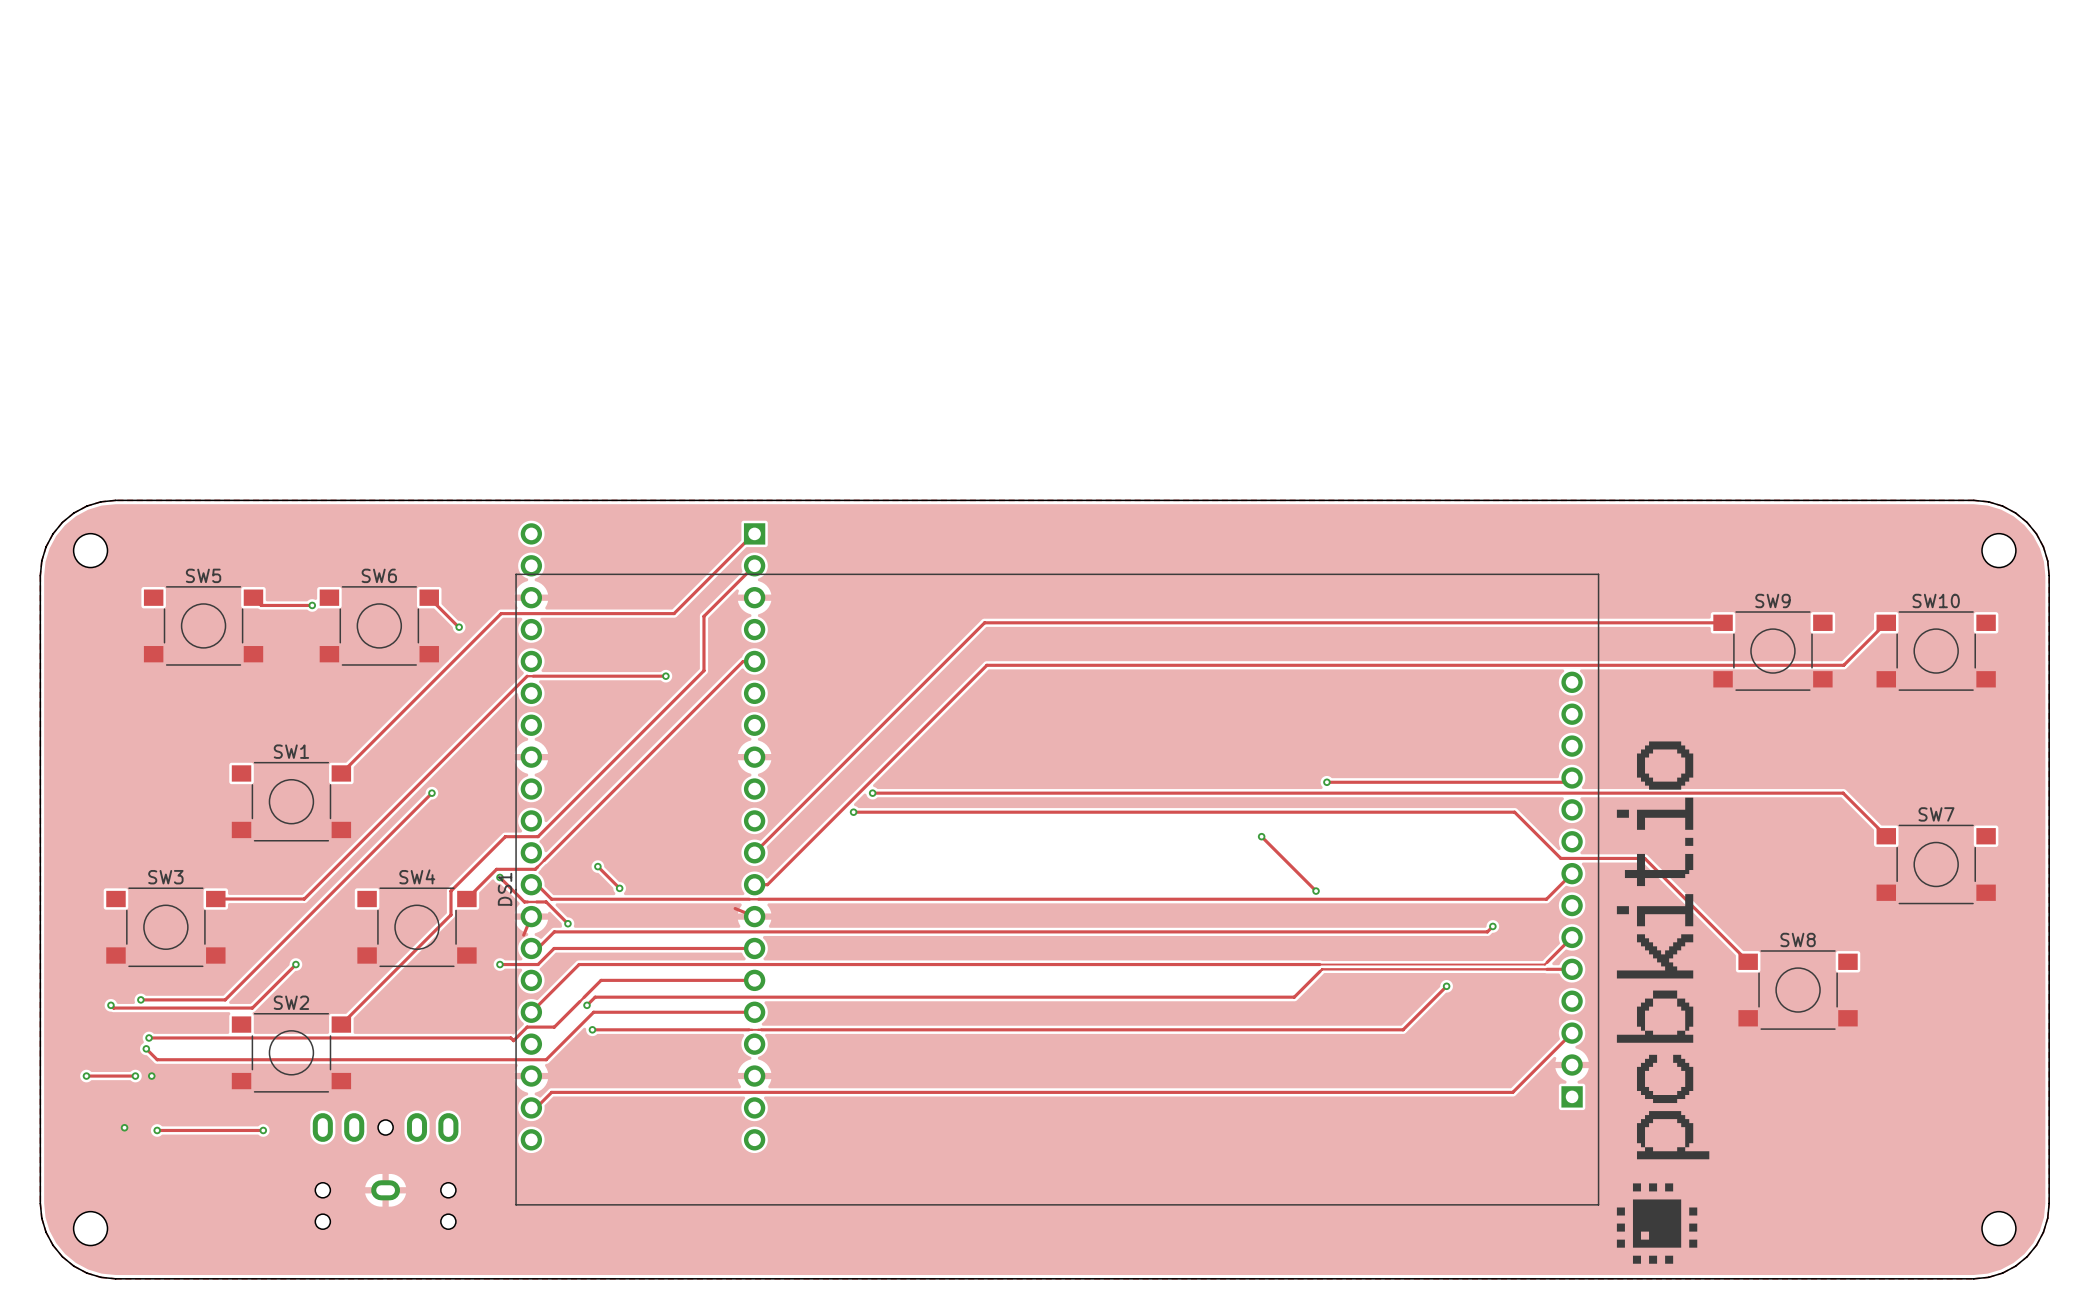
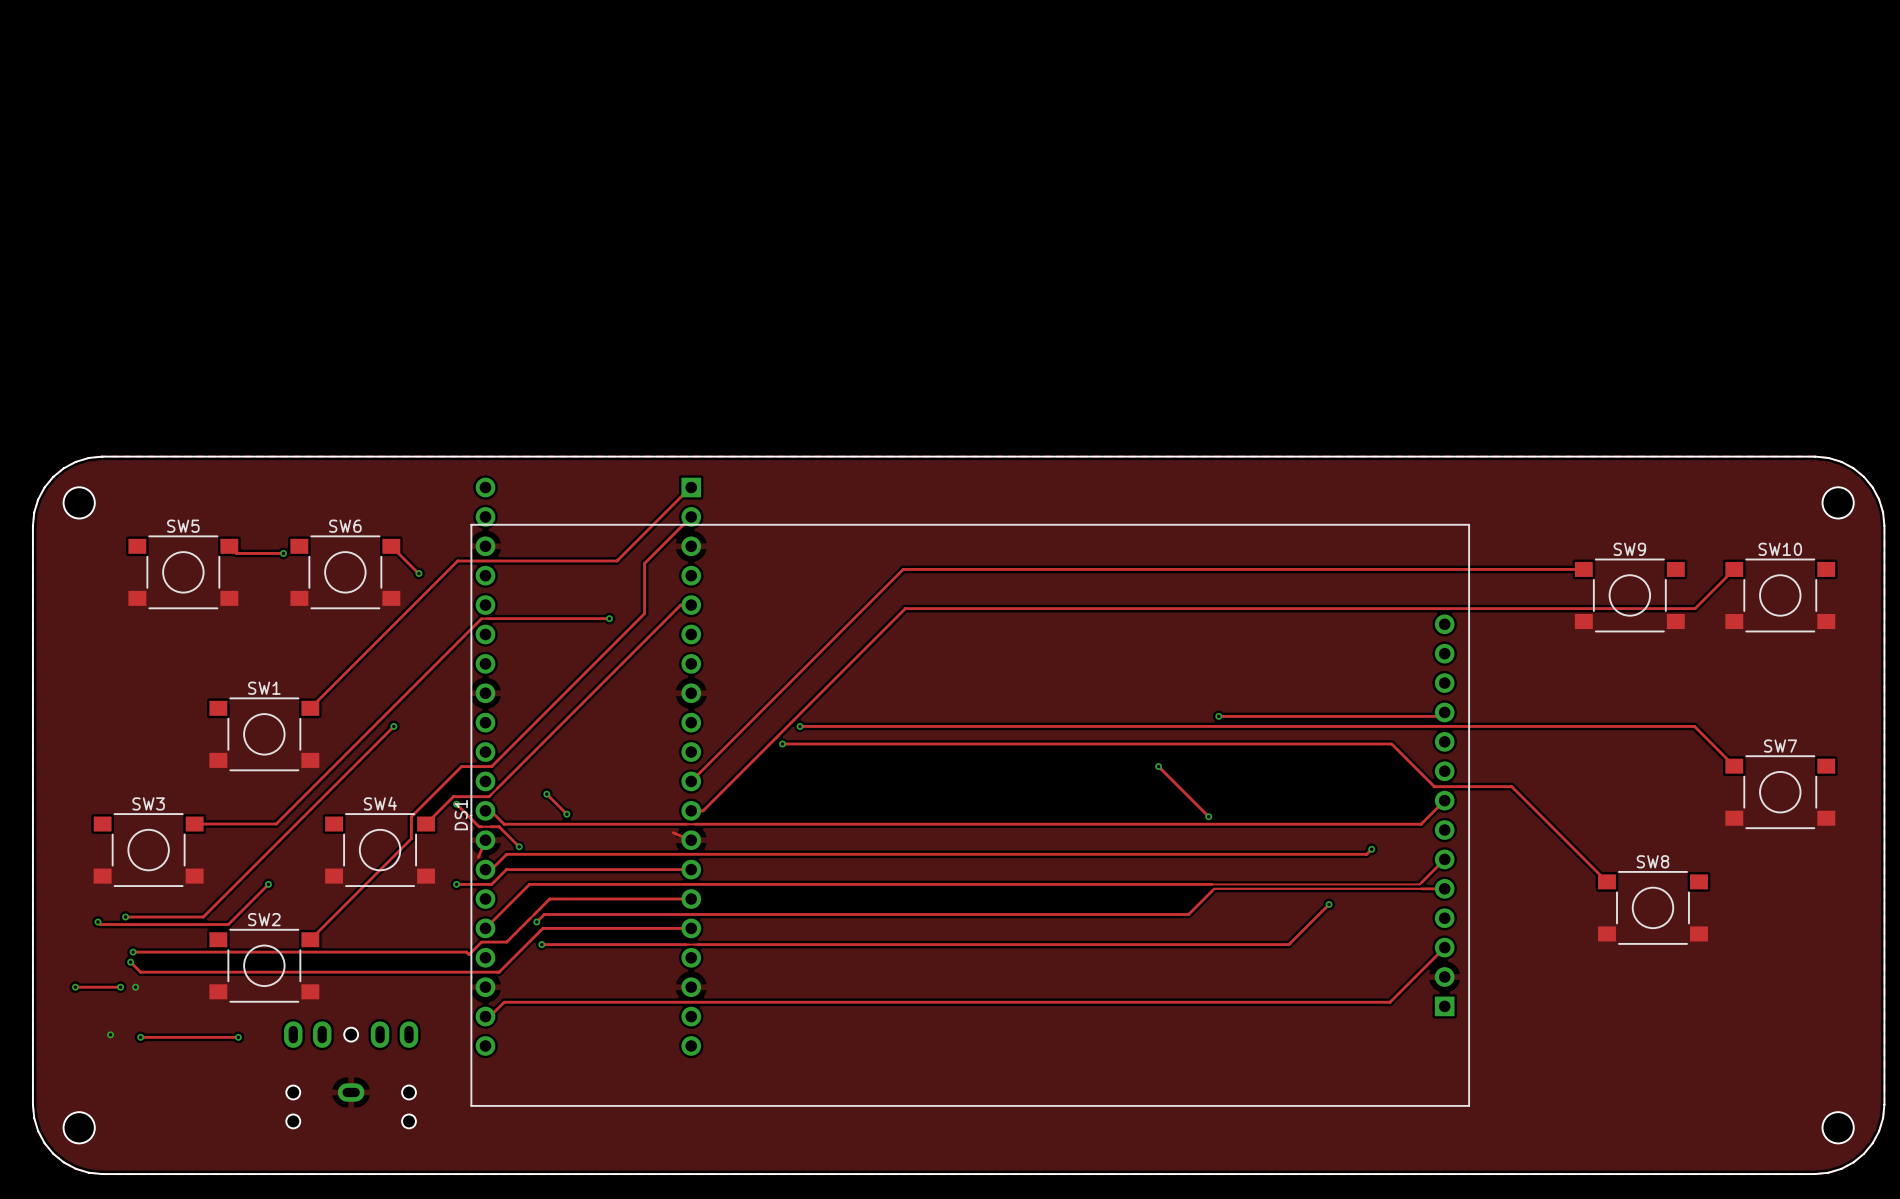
drawing: [1616, 741, 1710, 1264] -> none

